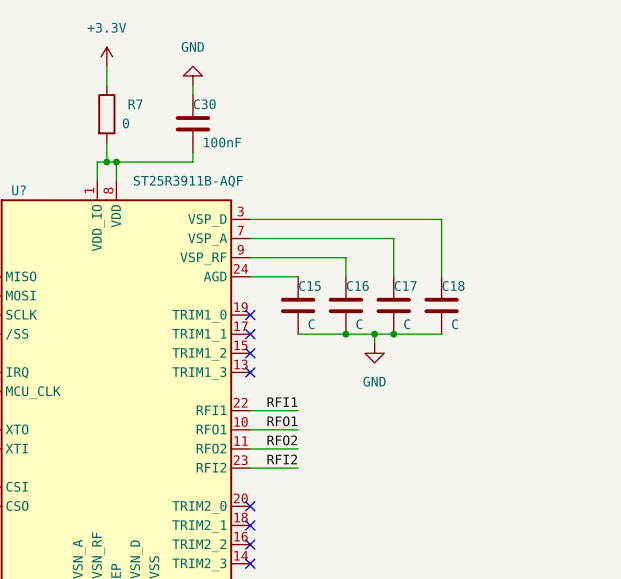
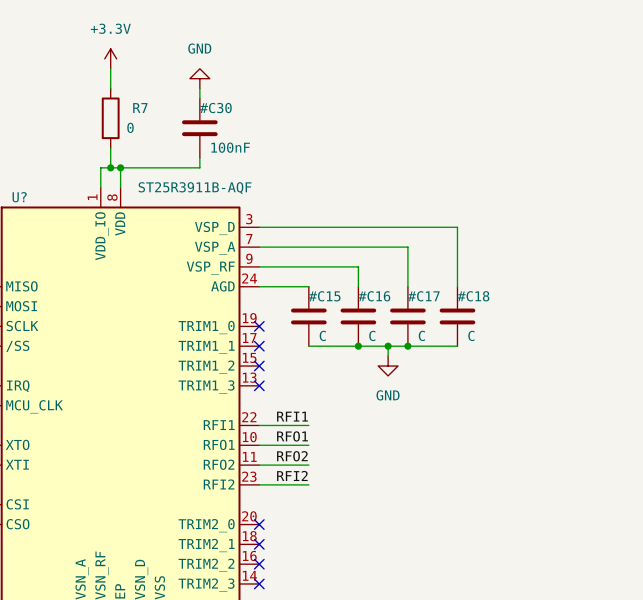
C30: 100nF (192, 123) -> none
#C30: none -> 100nF (199, 128)
C15: C (298, 305) -> none
#C15: none -> C (308, 316)
C16: C (345, 305) -> none
#C16: none -> C (358, 316)
C17: C (393, 305) -> none
#C17: none -> C (407, 316)
C18: C (441, 305) -> none
#C18: none -> C (457, 316)

